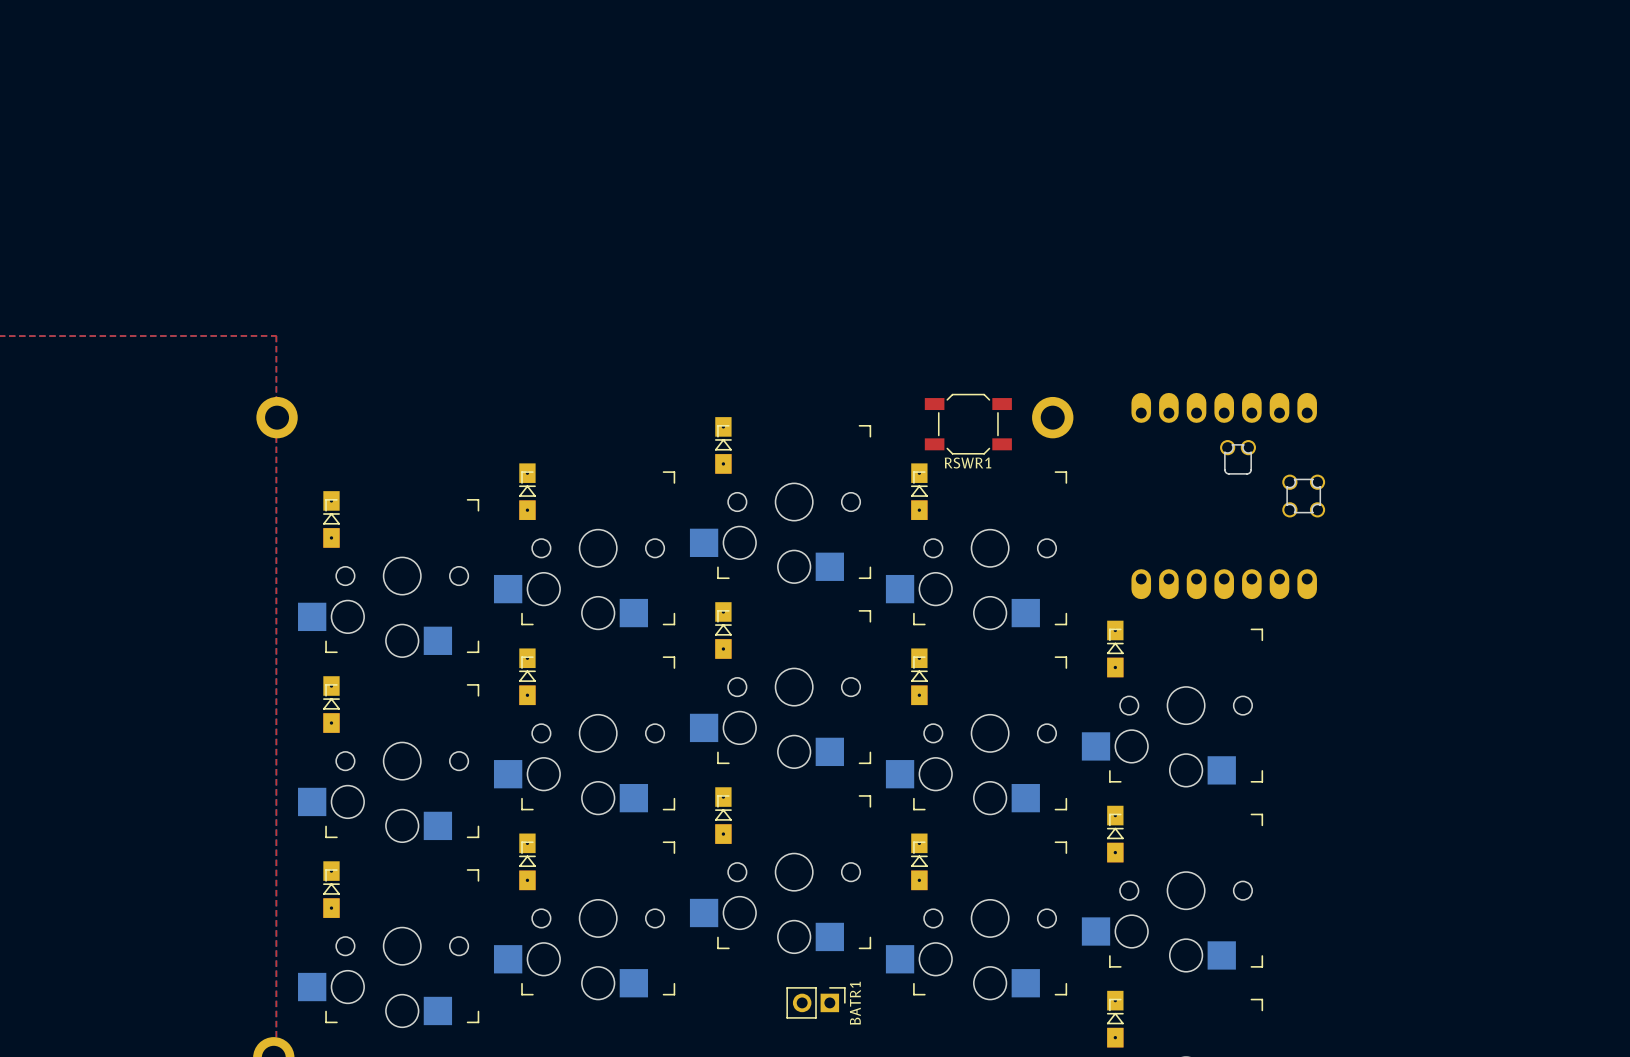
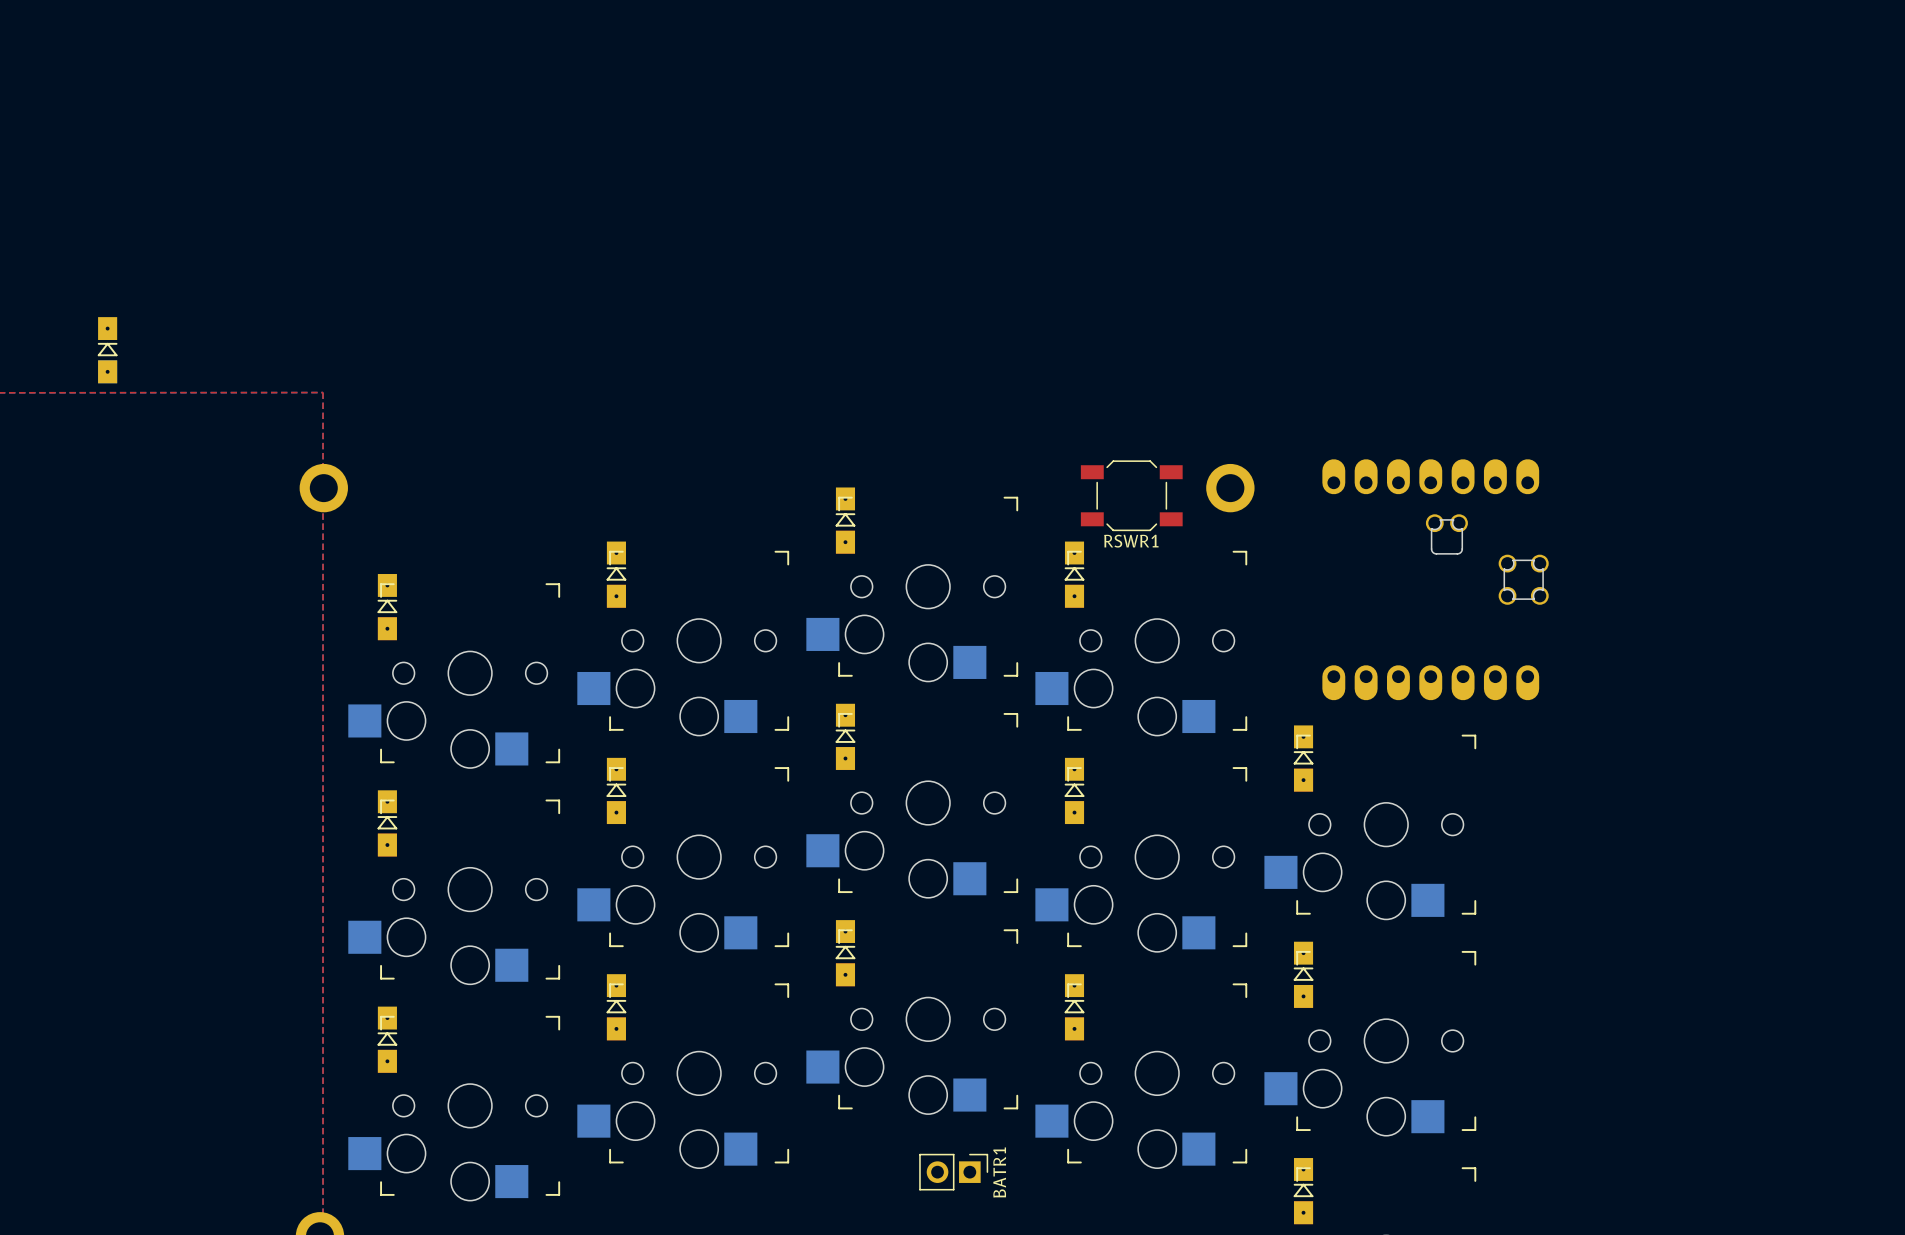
part: none -> (107, 350)

